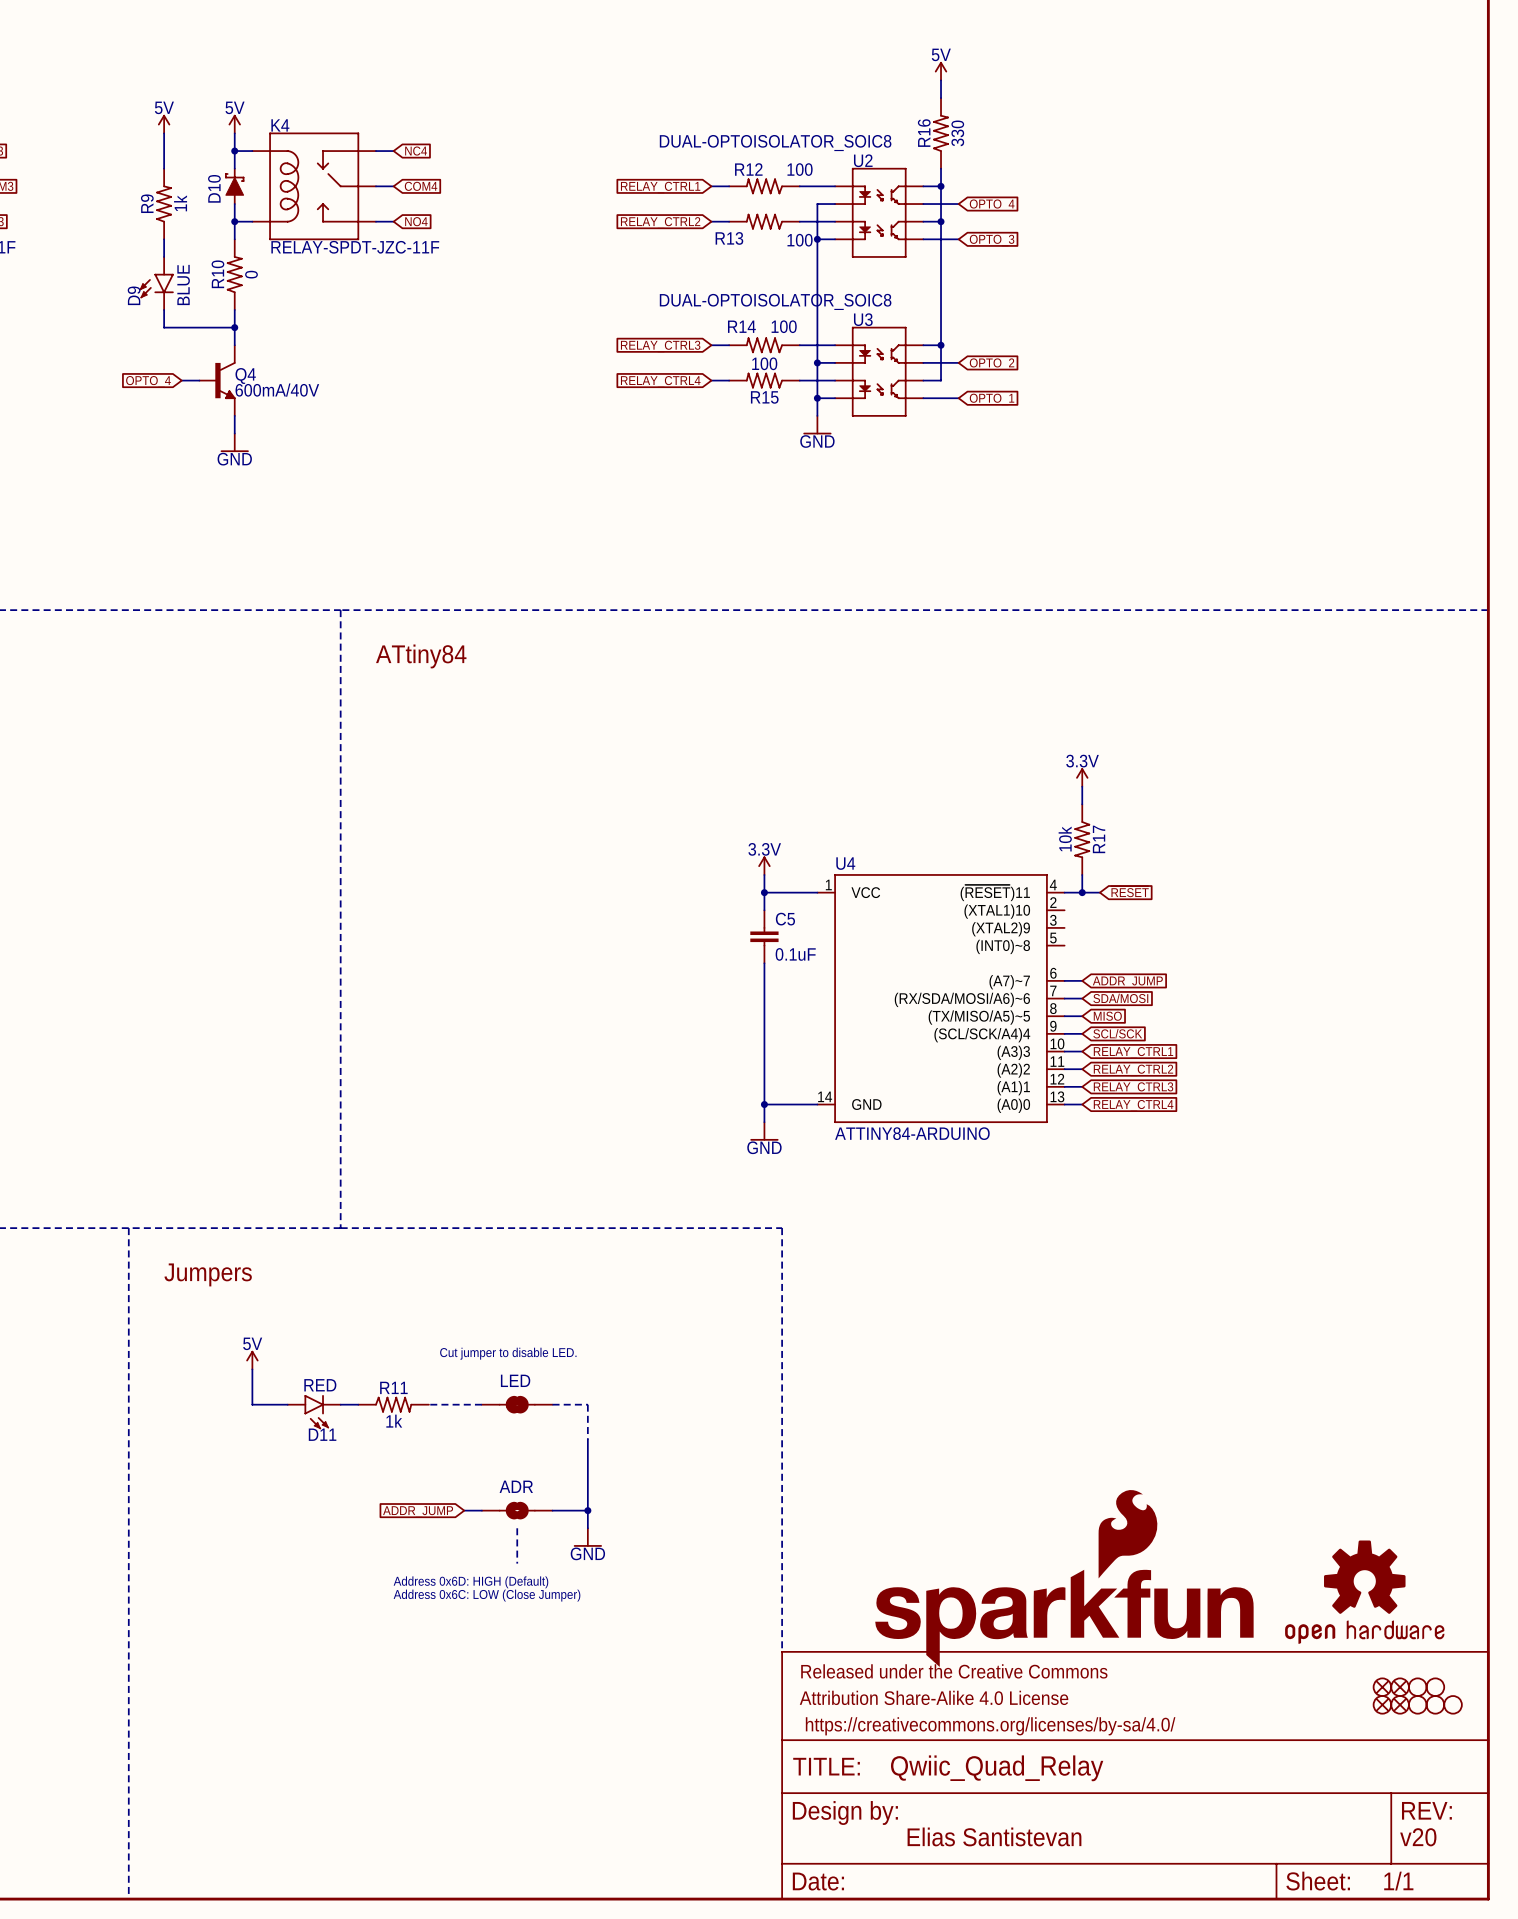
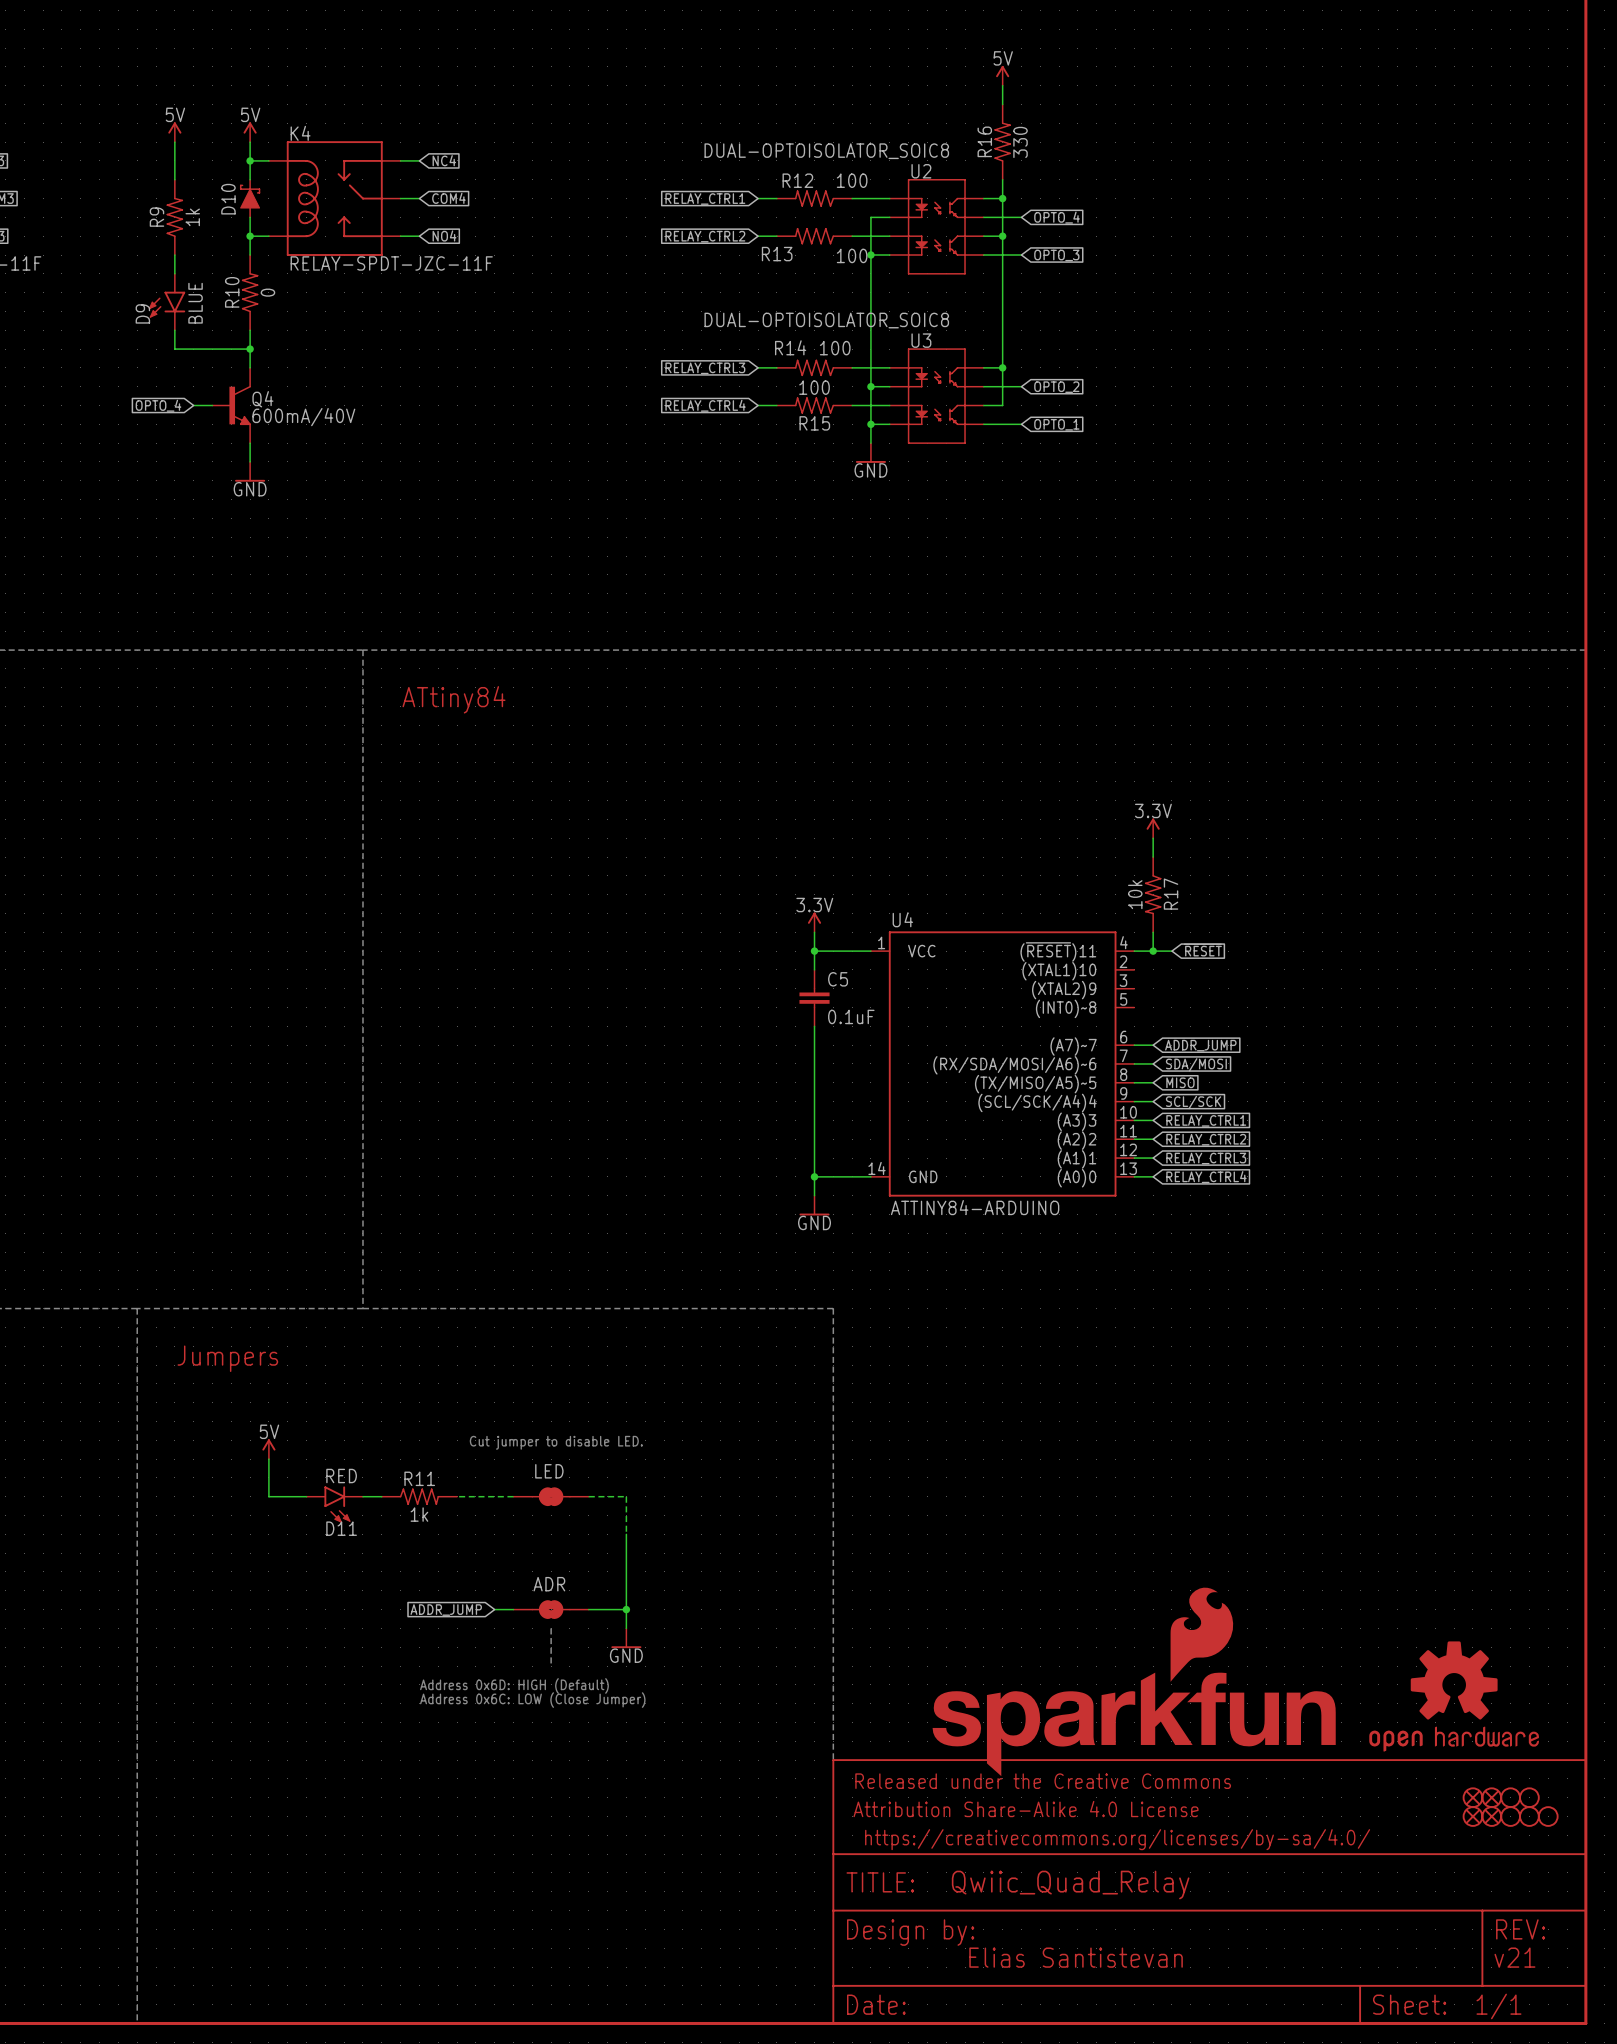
text: v20 (1418, 1837) -> v21 (1514, 1957)

